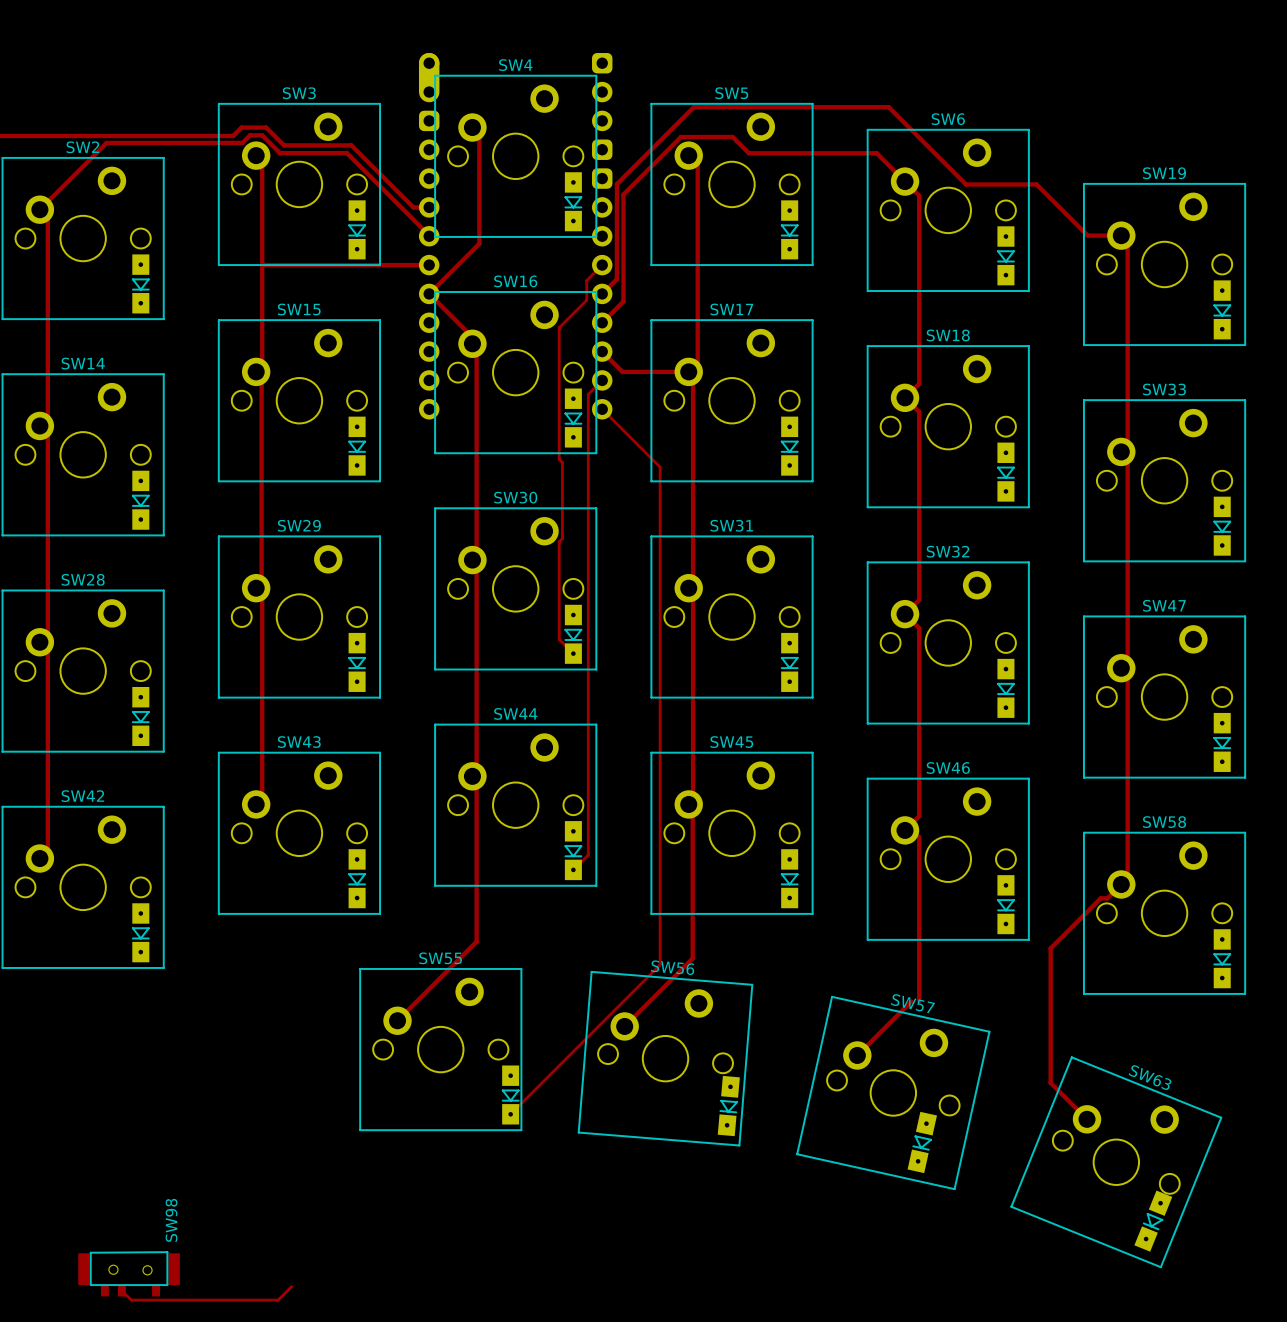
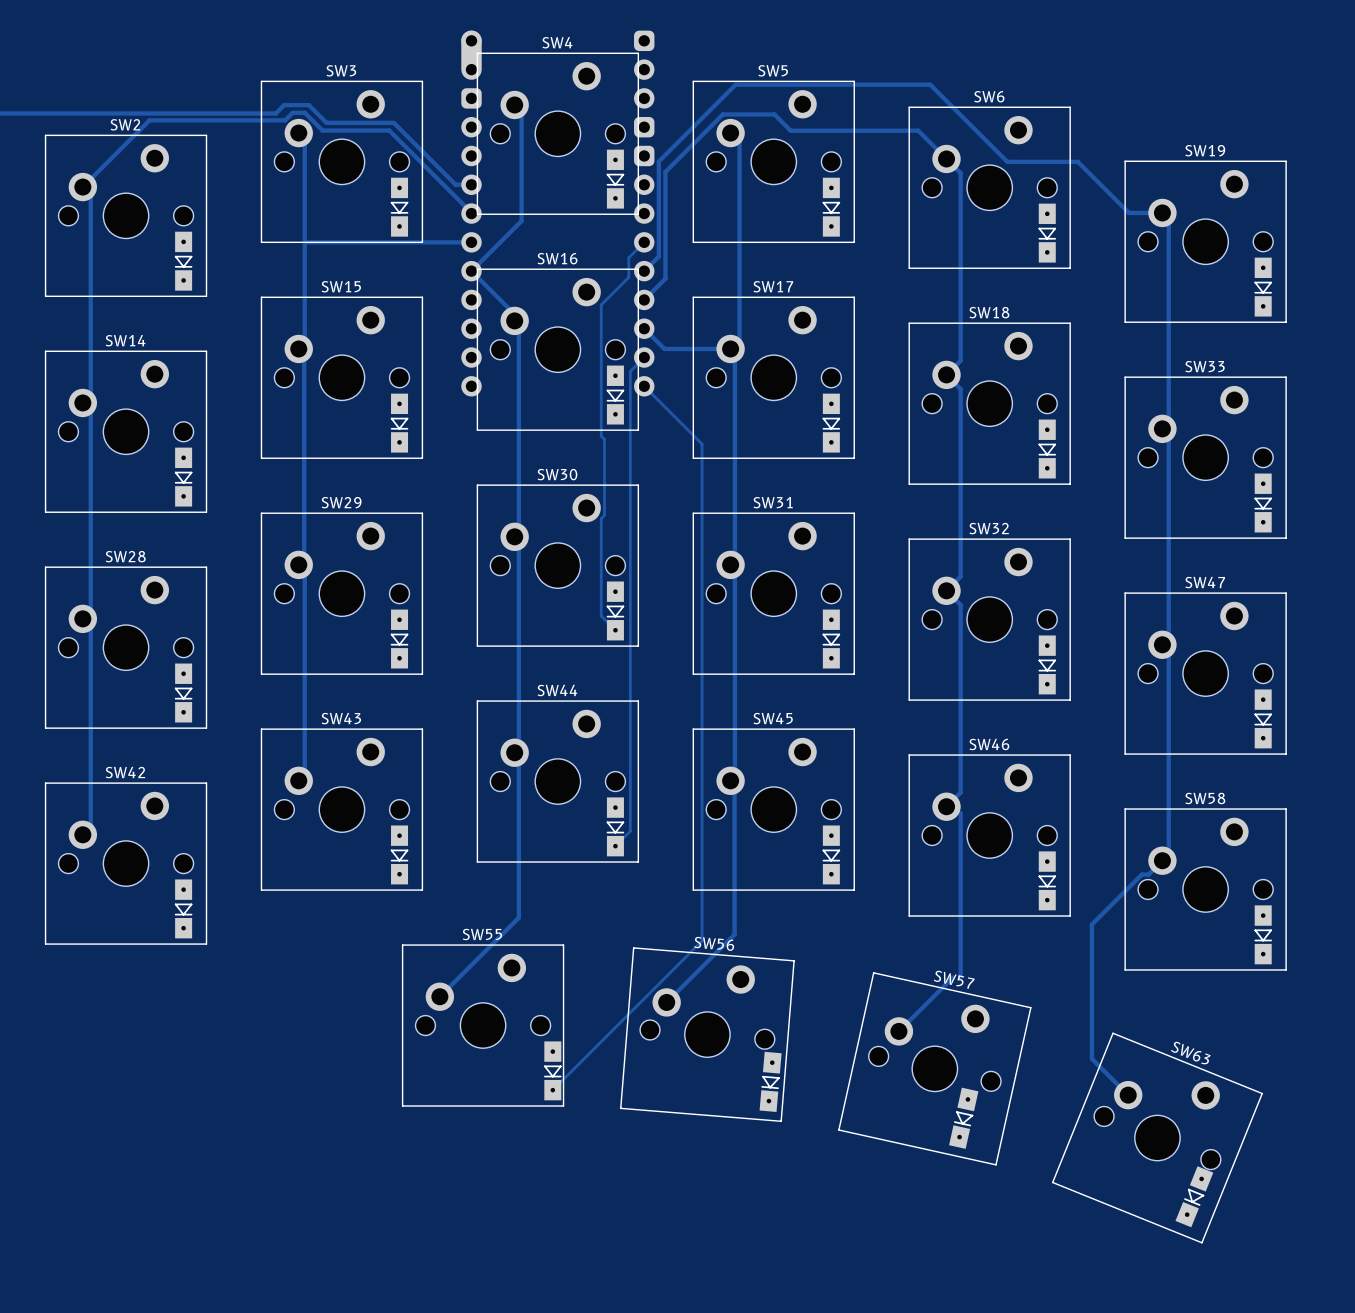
SW98: (129, 1273) -> none
track: (291, 1286) (278, 1300) (131, 1300) (121, 1290) -> none

